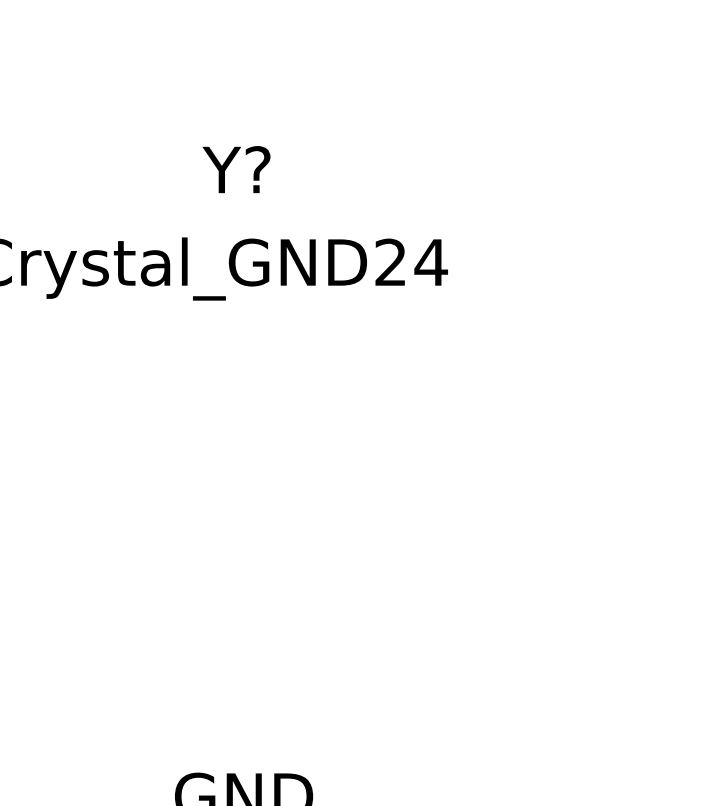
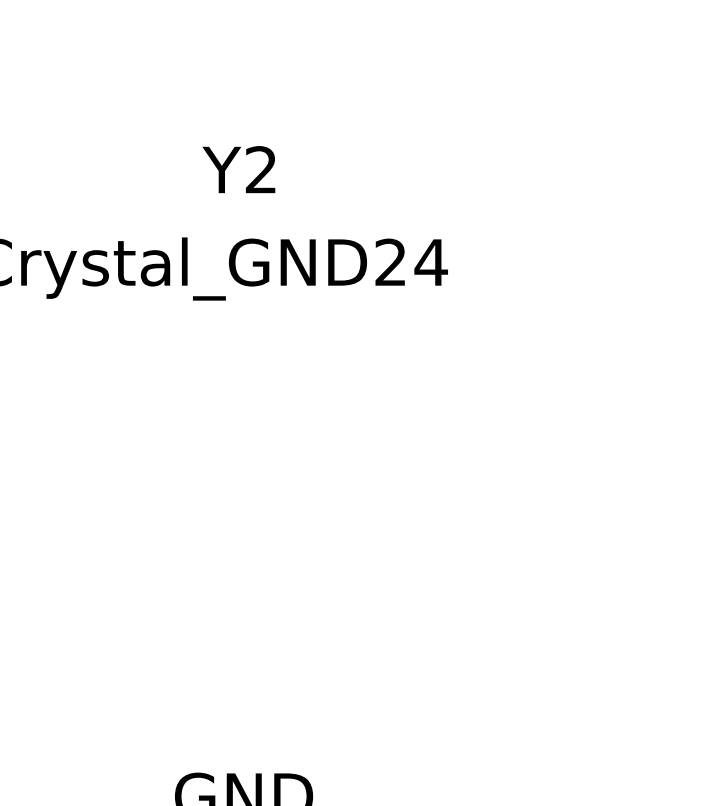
Y? name: Y? (236, 169) -> Y2 (238, 169)

